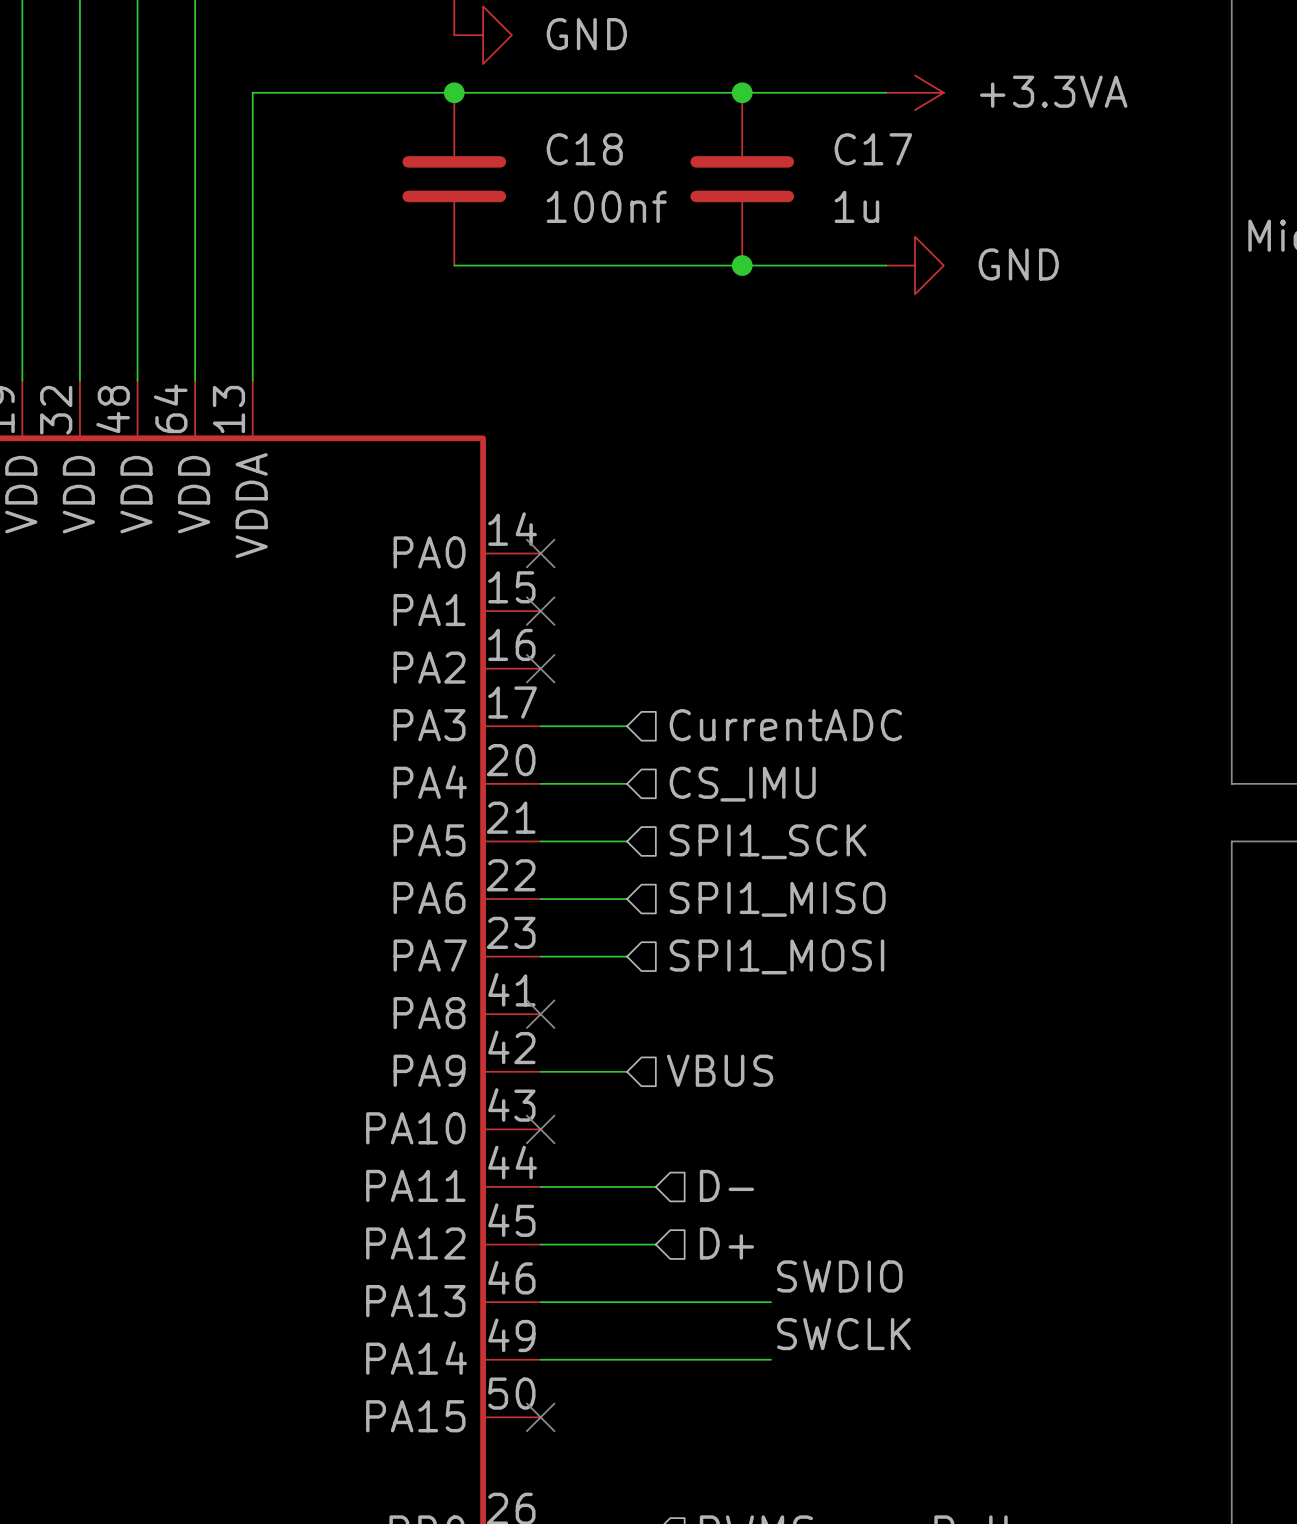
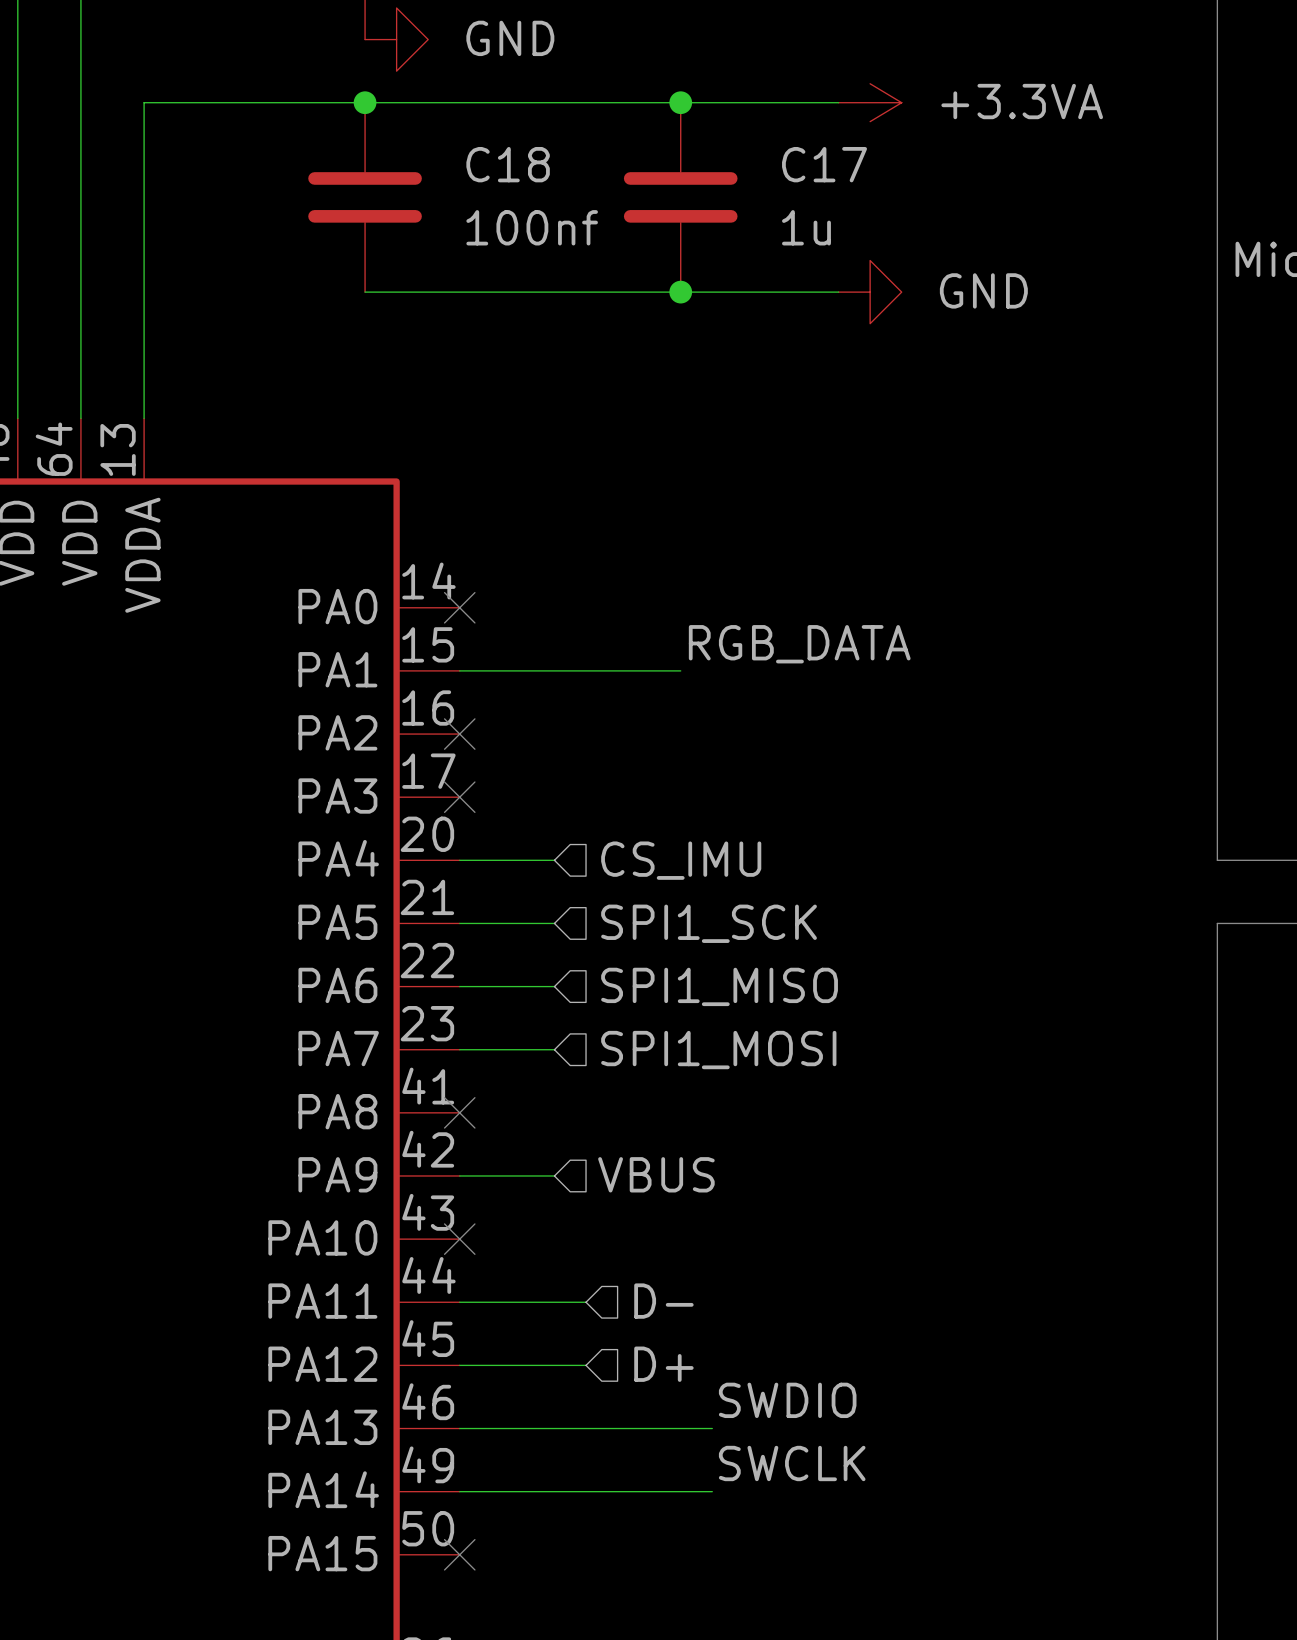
label: none -> RGB_DATA (799, 644)
wire: none -> (459, 670) (680, 670)
no-connect mark position: (540, 611) -> (459, 797)
hierarchical label: CurrentADC (785, 725) -> none
wire: (540, 726) (627, 726) -> none

